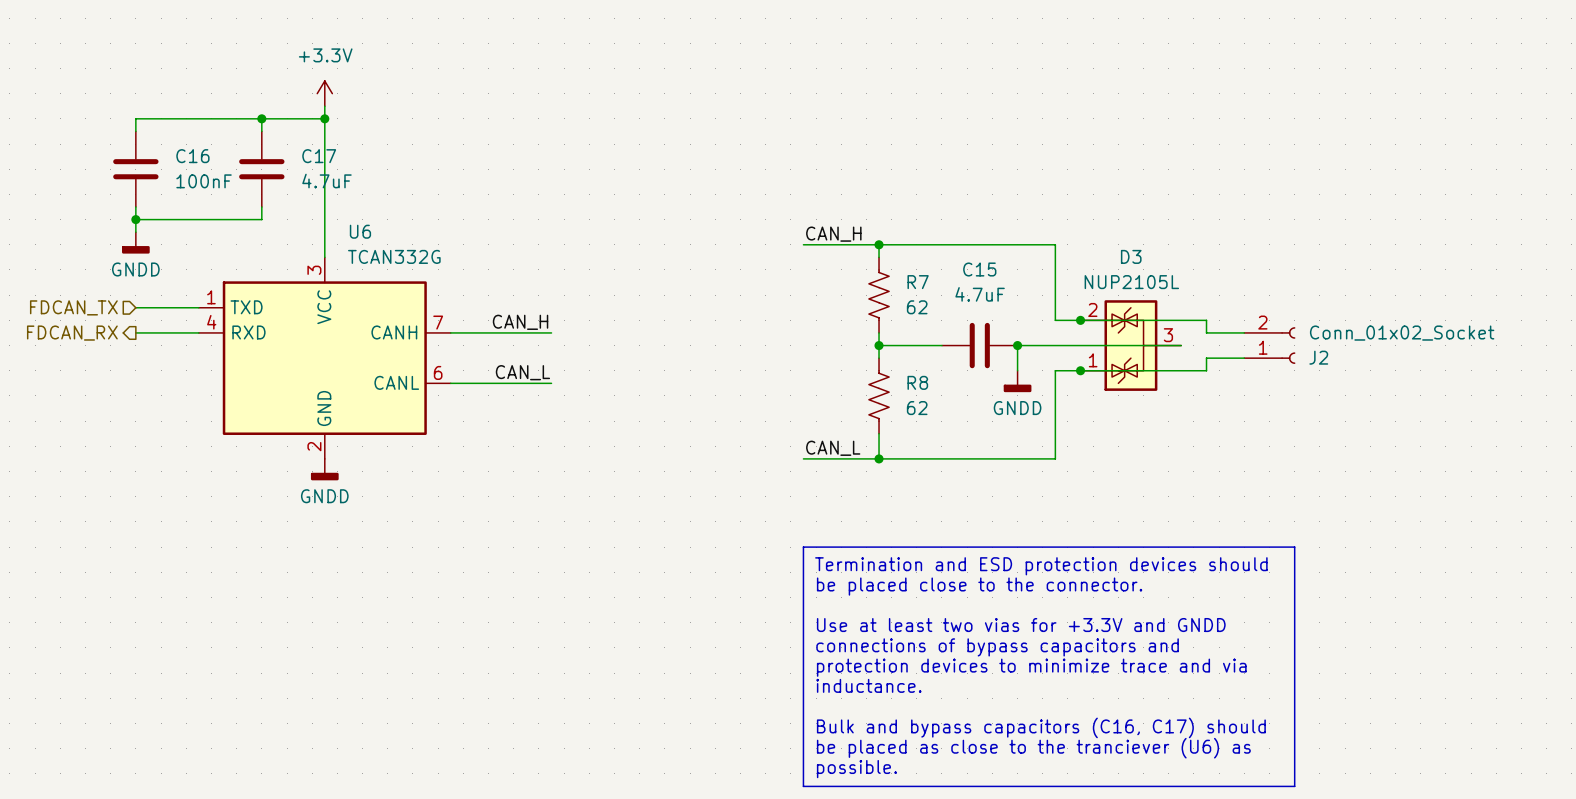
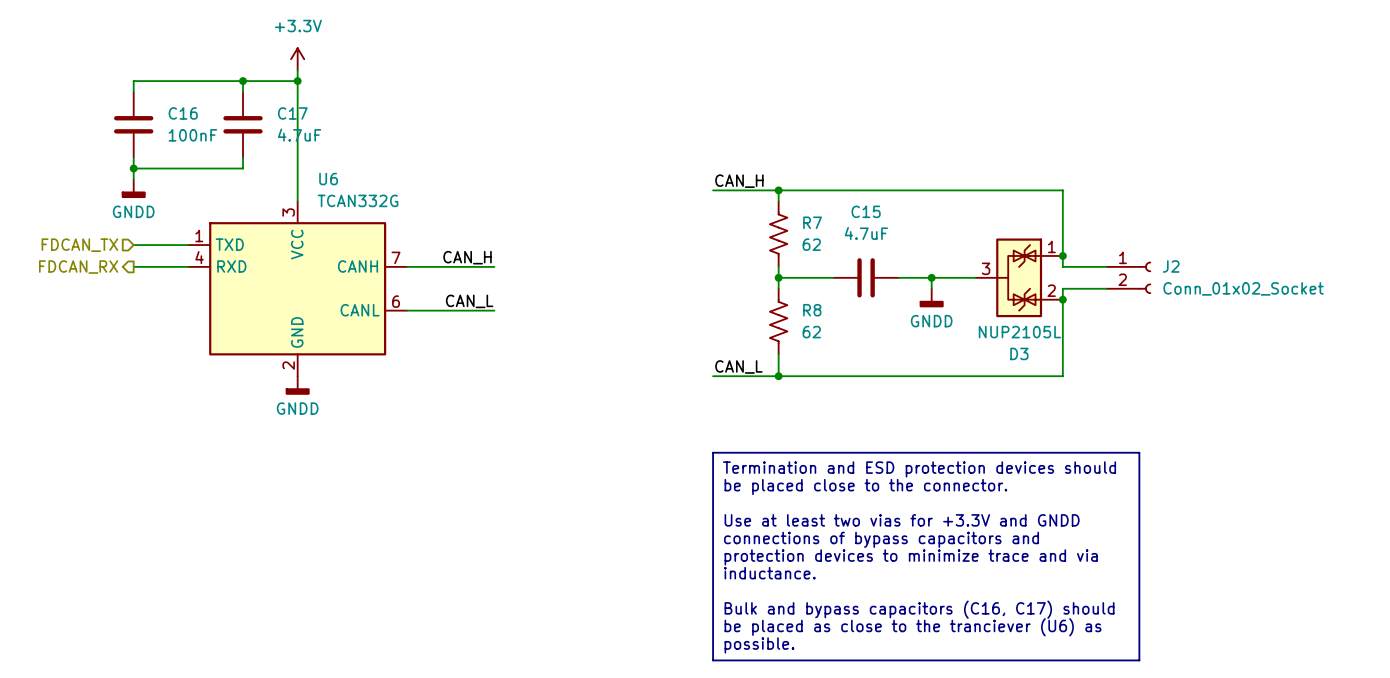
wire: (1055, 244) (1055, 320) (1206, 320) -> (931, 190) (1062, 190) (1062, 255)
junction: (1080, 320) -> none
junction: none -> (1062, 255)
wire: (1017, 345) (1017, 370) -> none
junction: (1017, 345) -> none
wire: none -> (931, 277) (931, 288)
junction: none -> (931, 277)
D3 rotation: 0° (1130, 345) -> 180° (1019, 277)
J2 flip: as is (1288, 345) -> up-down (1144, 277)
junction: (1080, 370) -> none
wire: (1206, 370) (1055, 370) (1055, 458) -> (1062, 299) (1062, 376) (931, 376)
junction: none -> (1062, 299)
power symbol position: GNDD (1017, 381) -> GNDD (931, 298)

